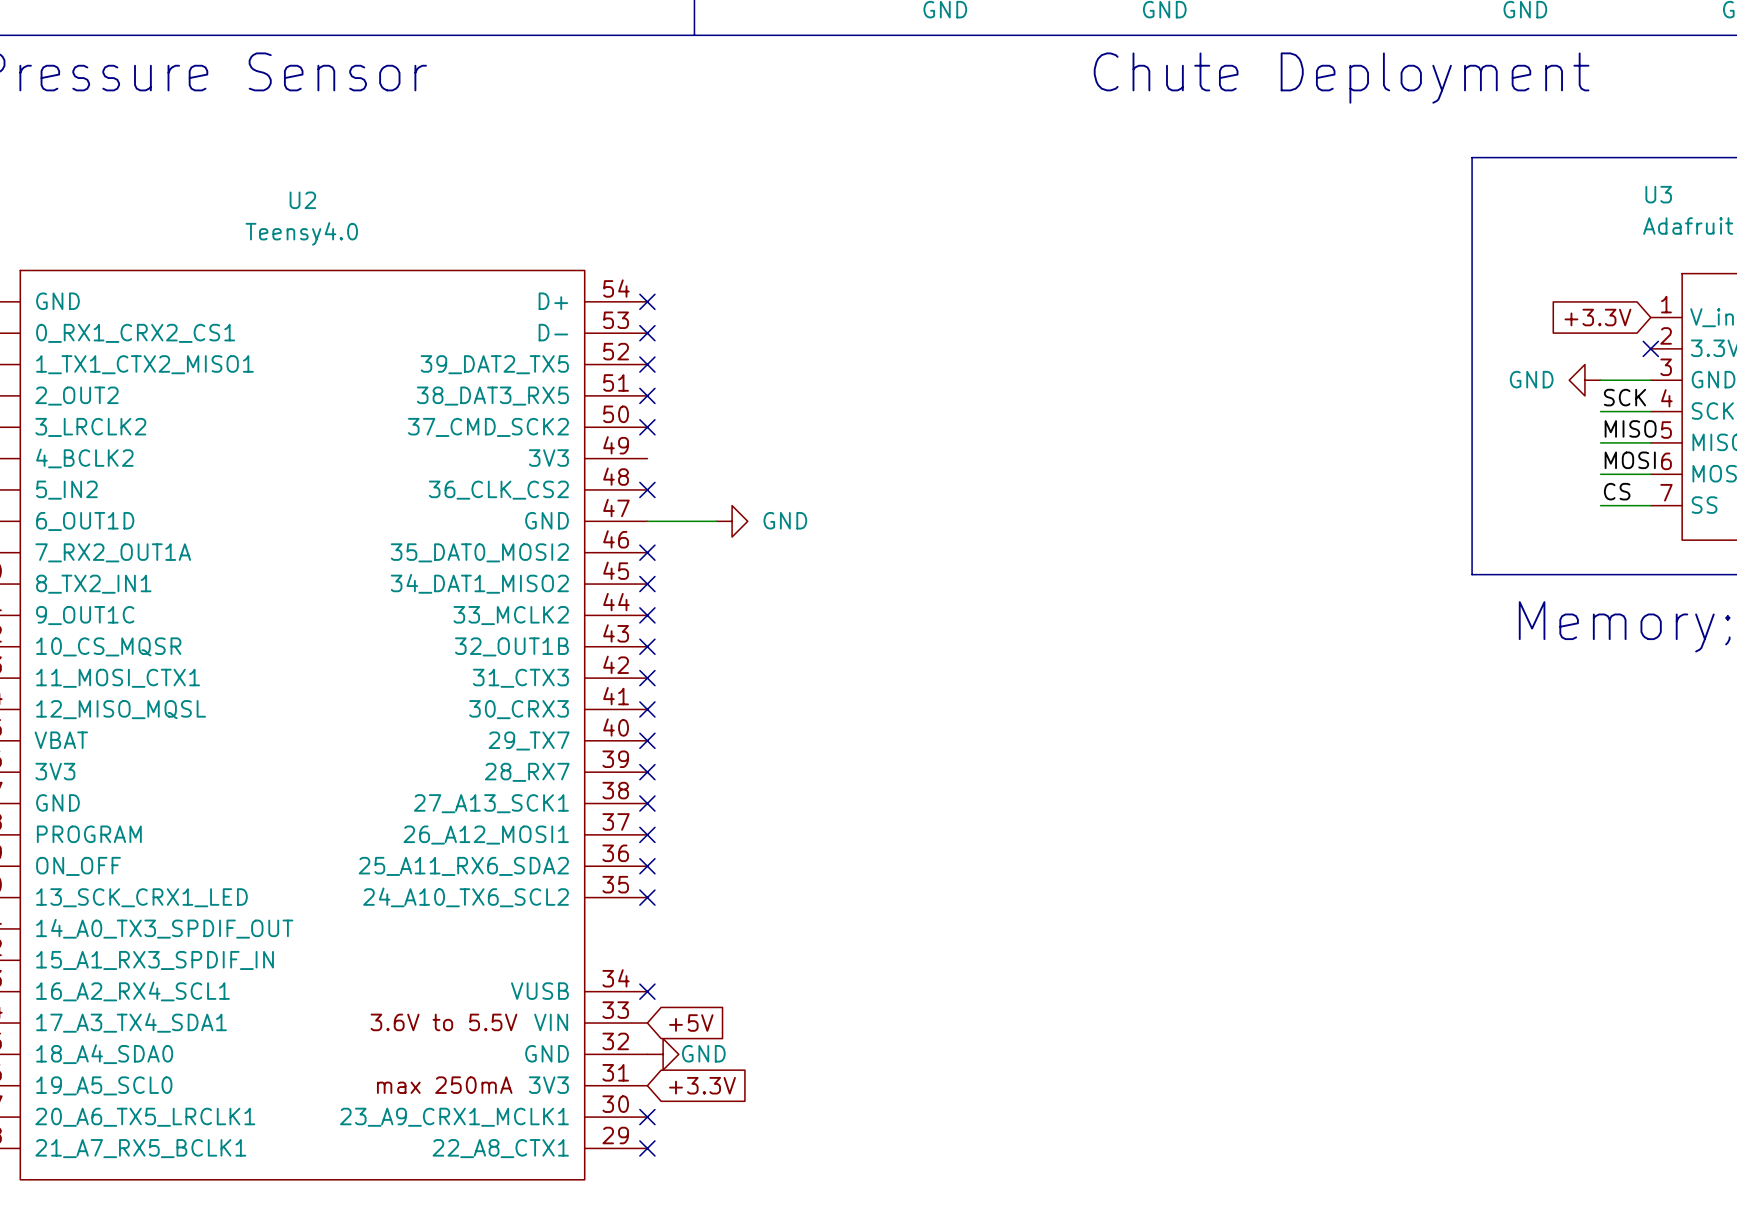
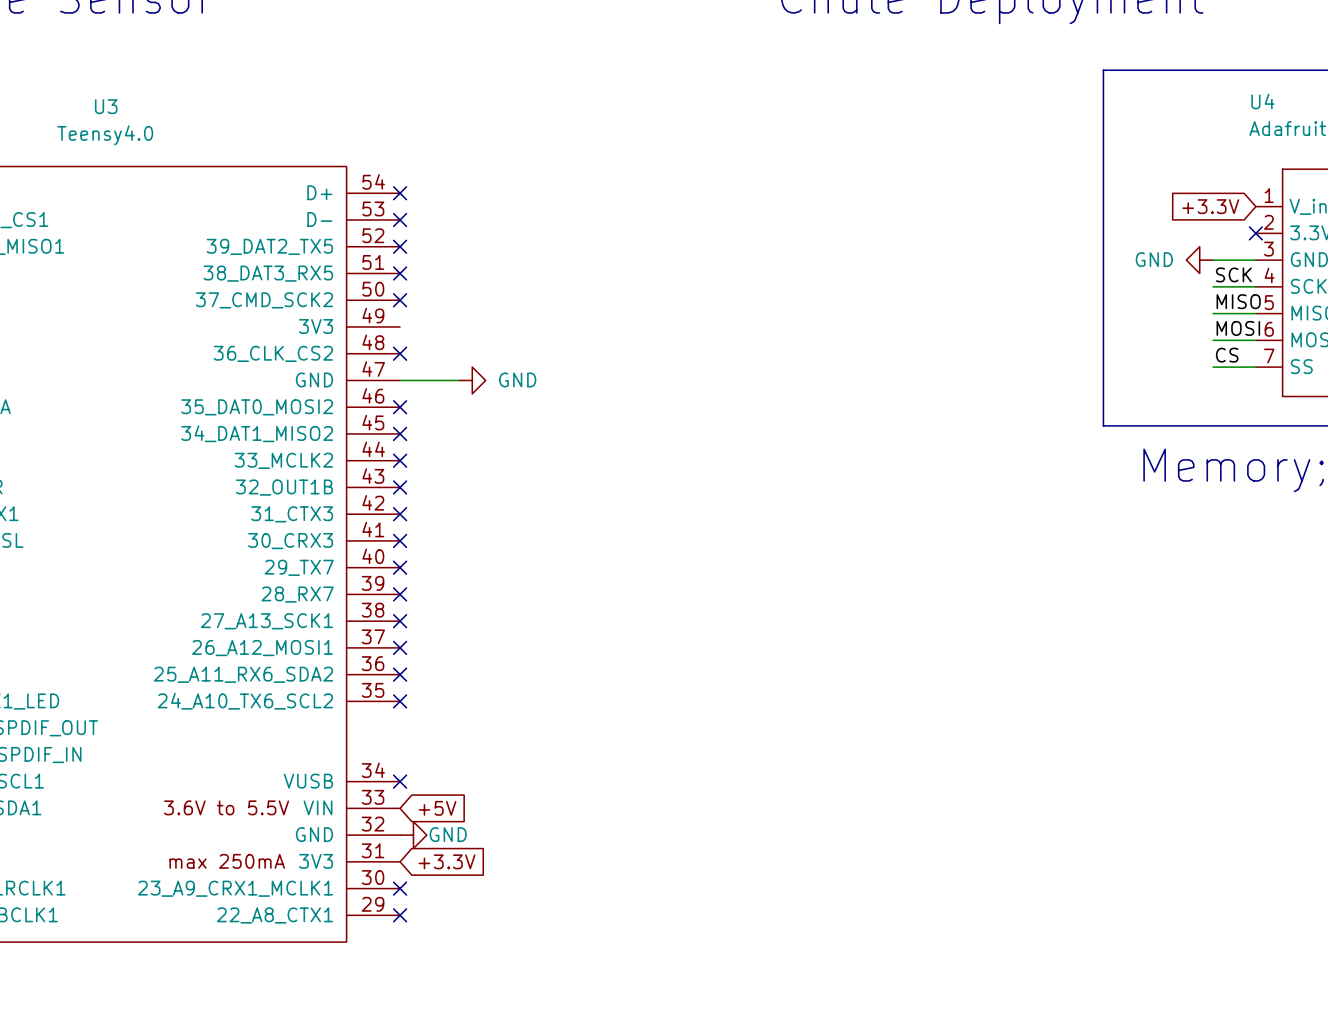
U3 name: U3 (1658, 194) -> U4 (1262, 101)
U2 name: U2 (302, 200) -> U3 (106, 106)

